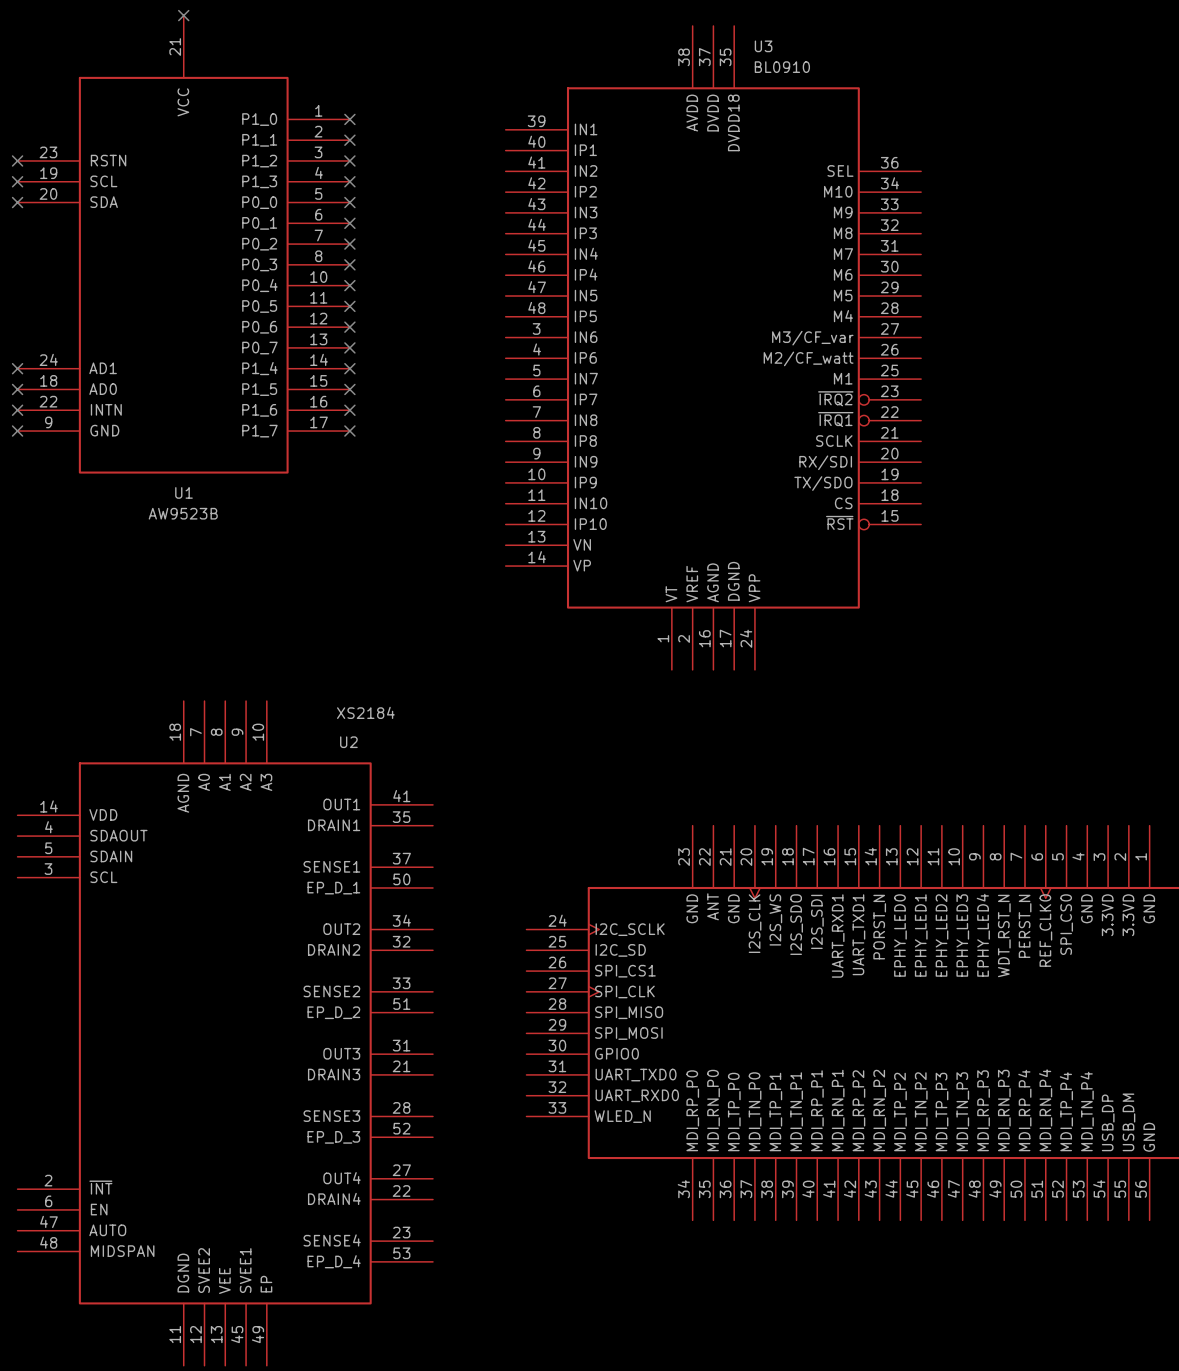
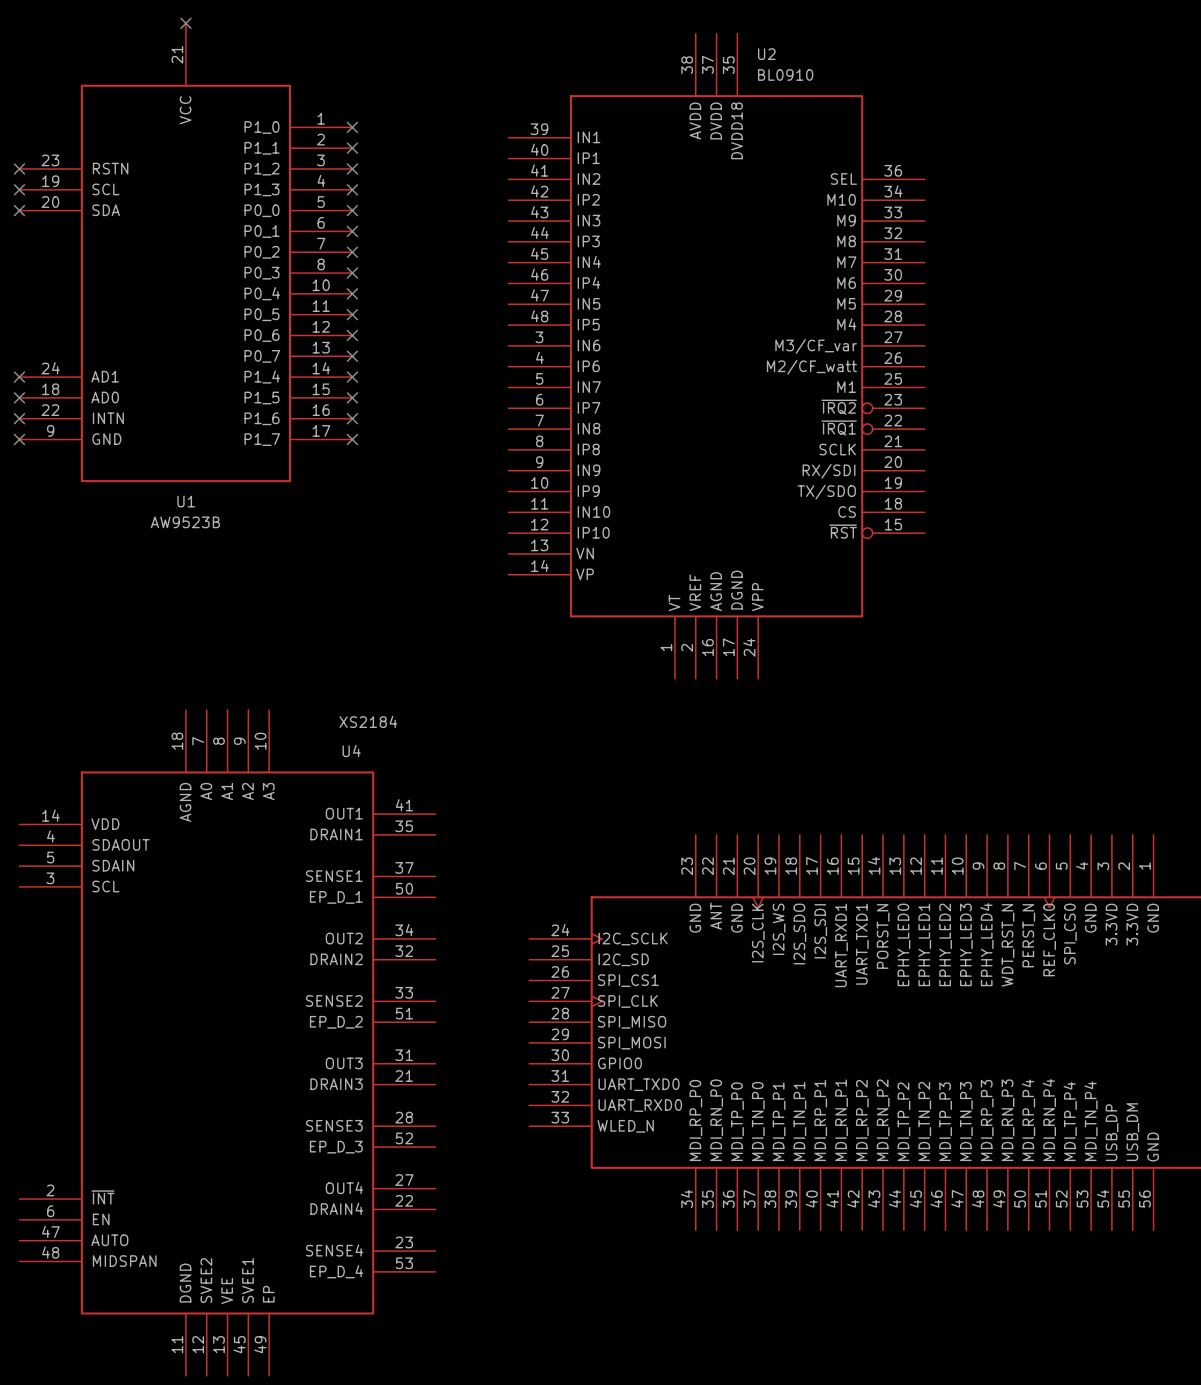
U3 name: U3 (763, 46) -> U2 (766, 54)
U2 name: U2 (348, 742) -> U4 (351, 751)

